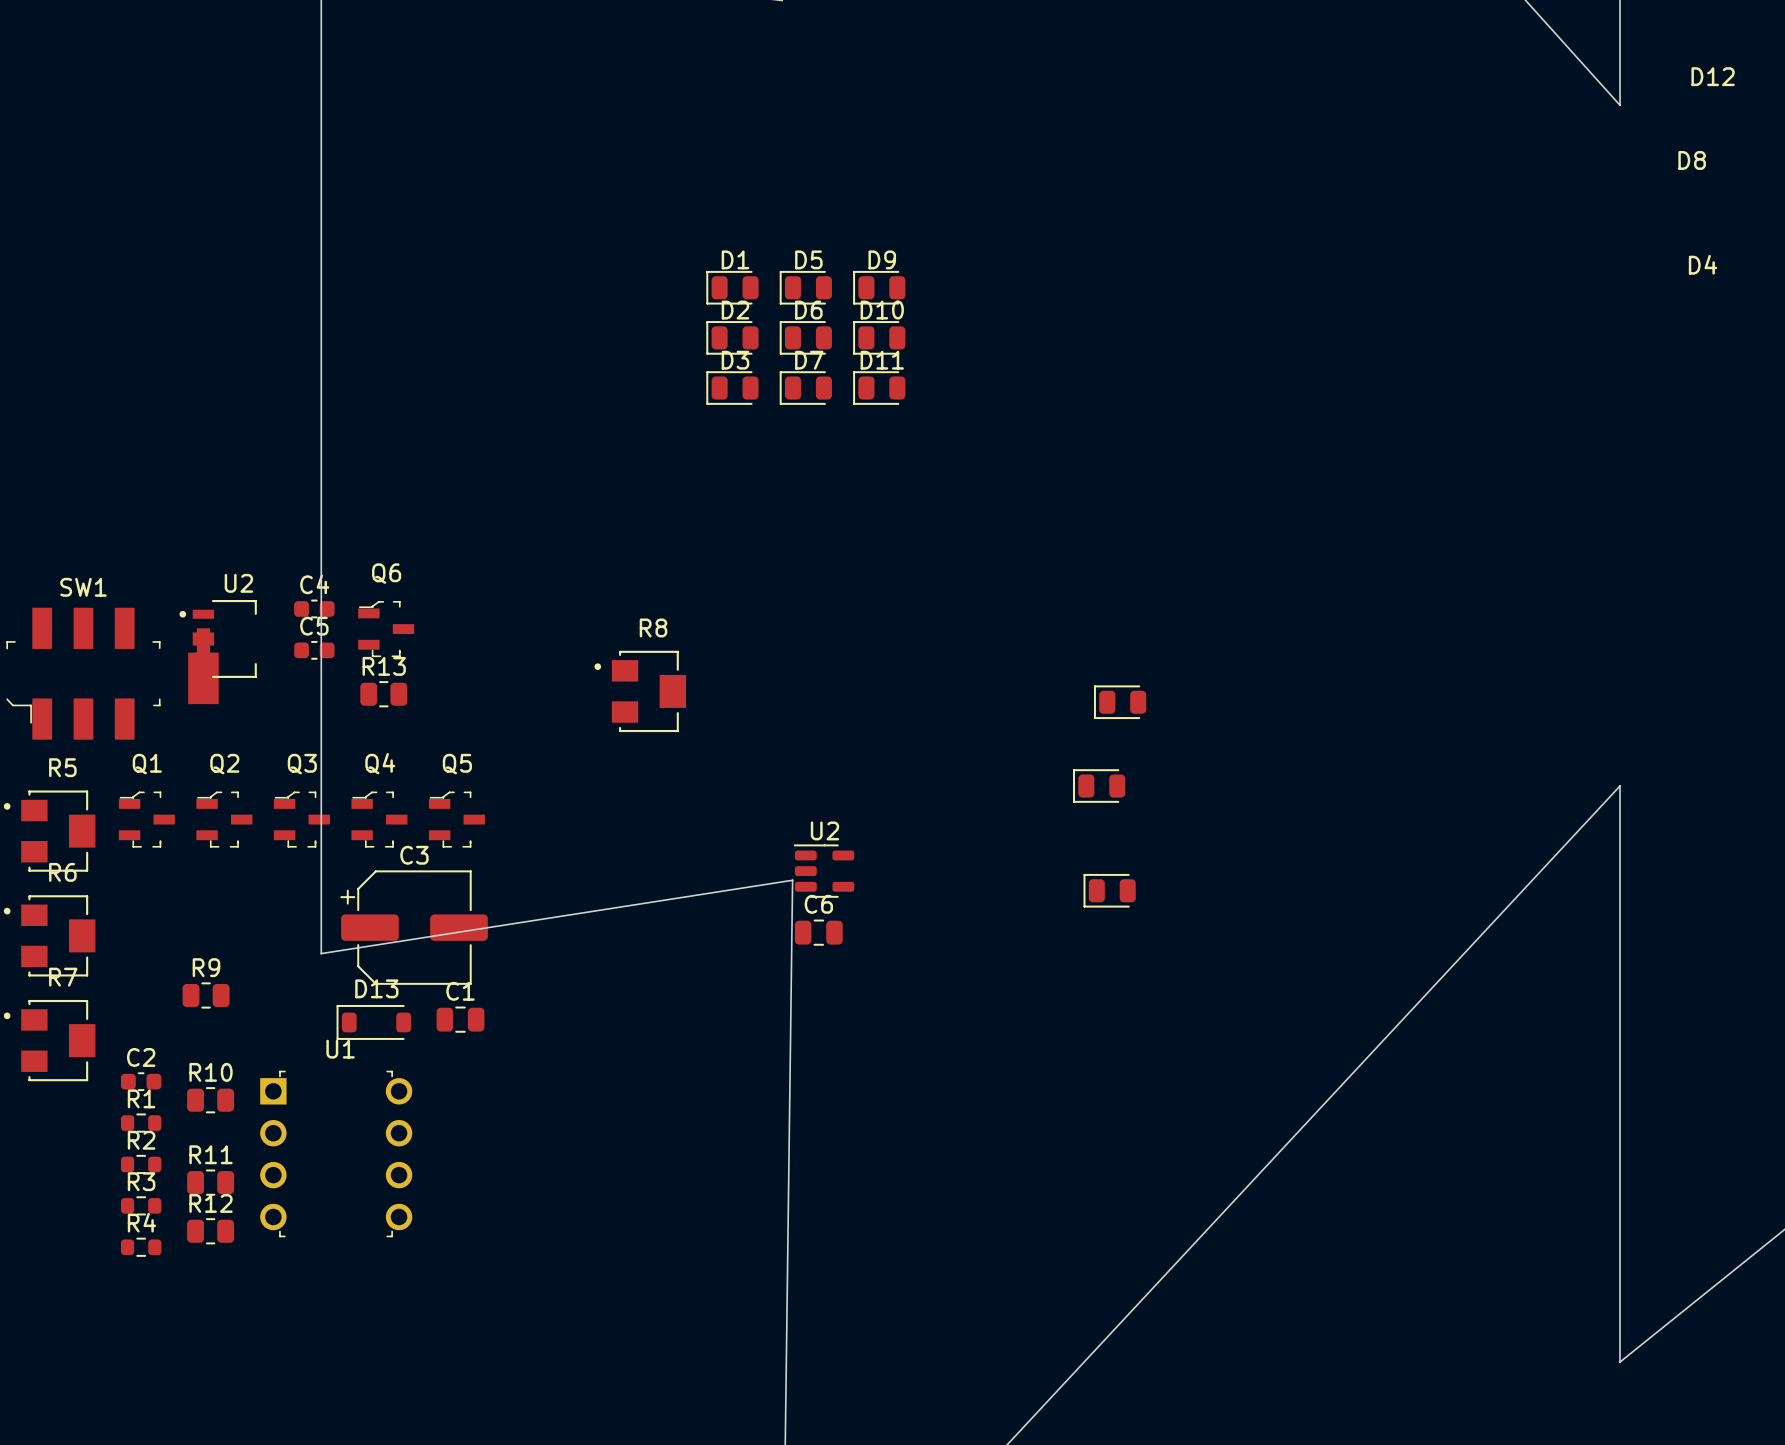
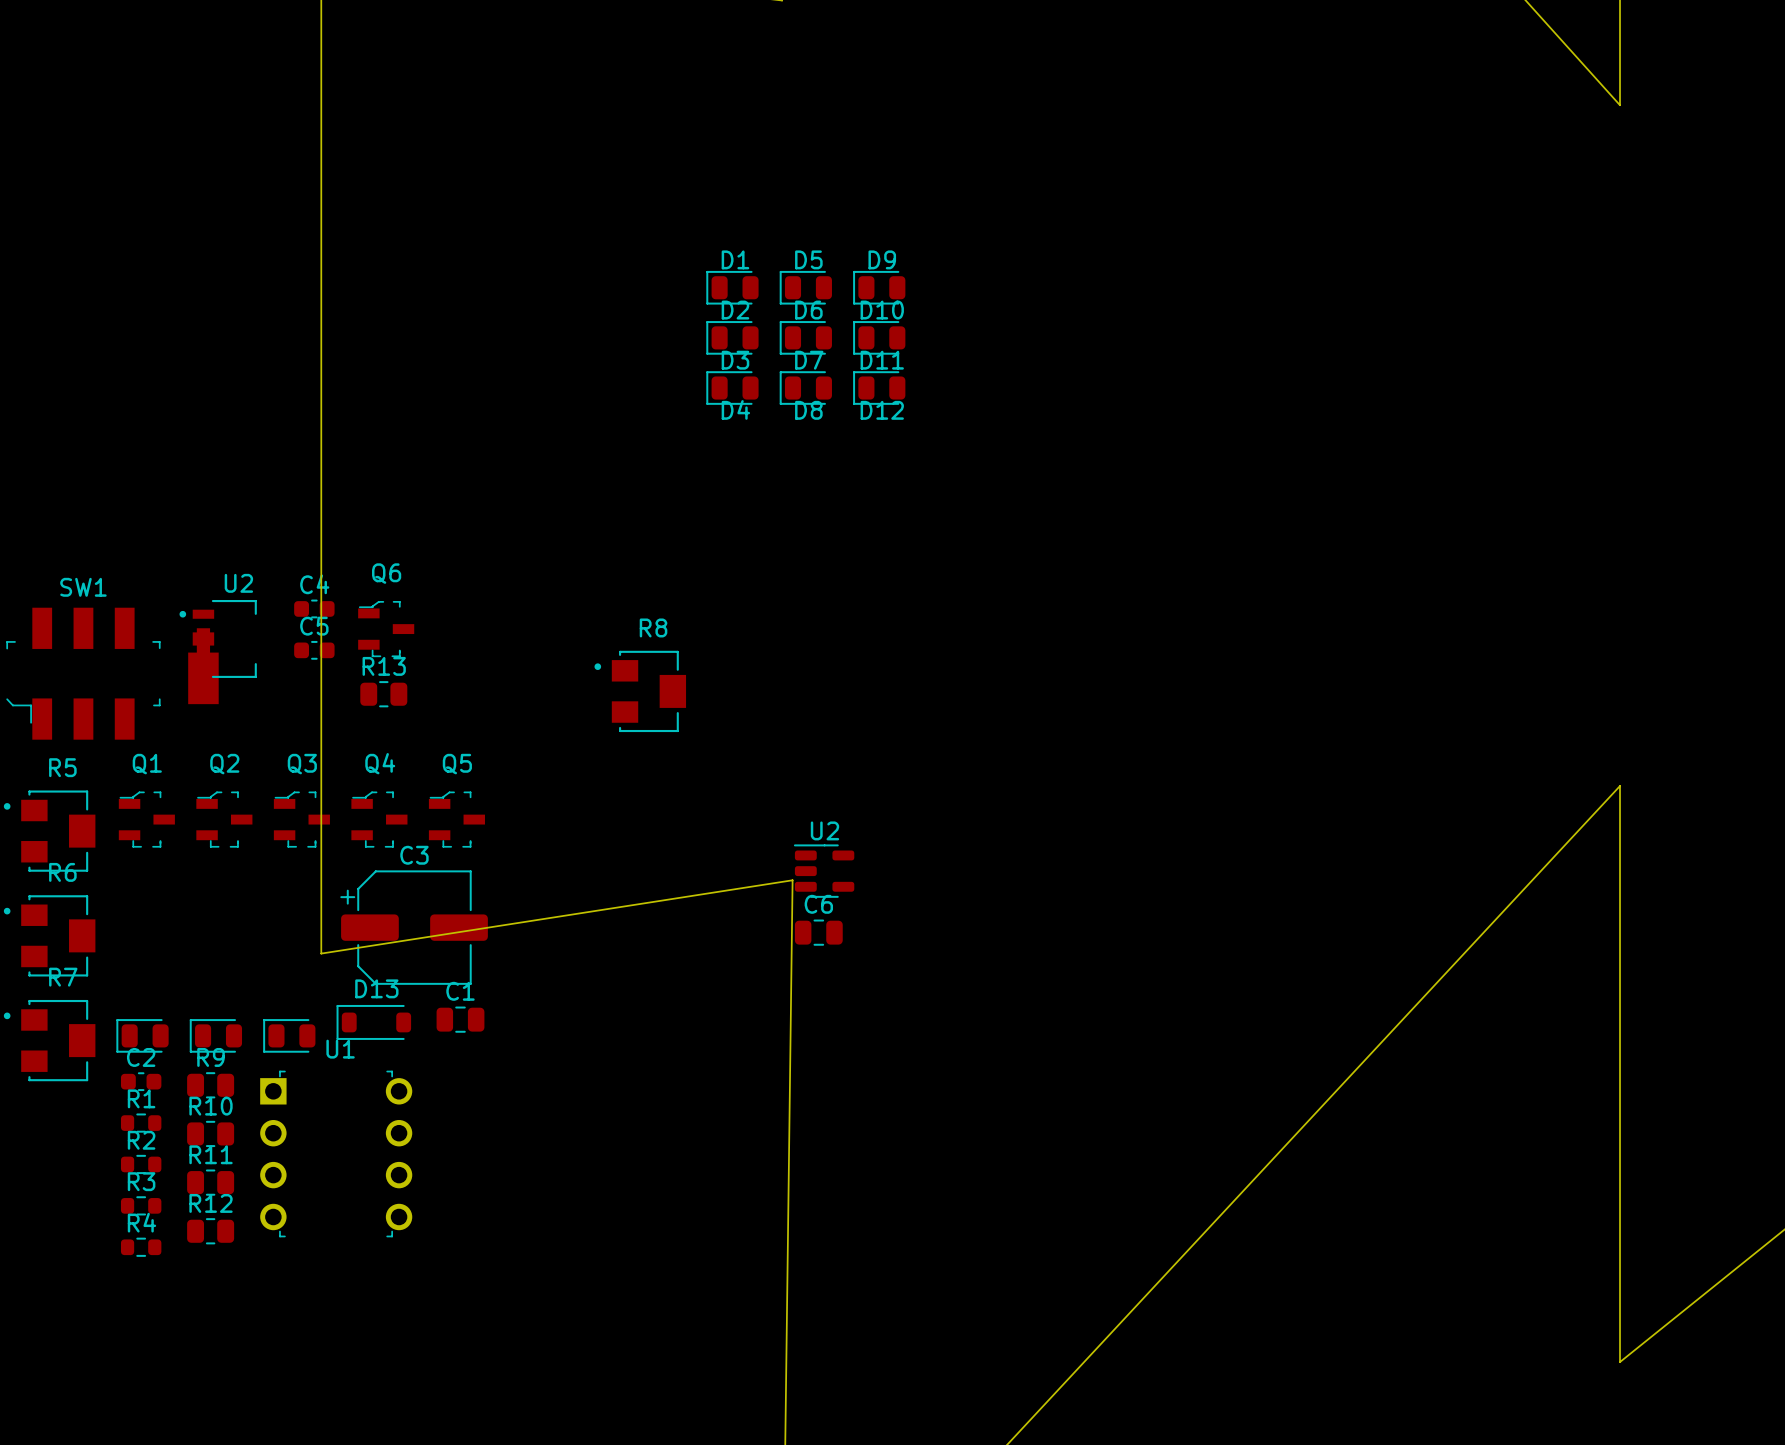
D12 position: (1120, 702) -> (289, 1035)
D8 position: (1099, 786) -> (215, 1035)
D4 position: (1109, 890) -> (142, 1035)
R9 position: (206, 995) -> (210, 1085)
R10 position: (210, 1100) -> (210, 1133)

